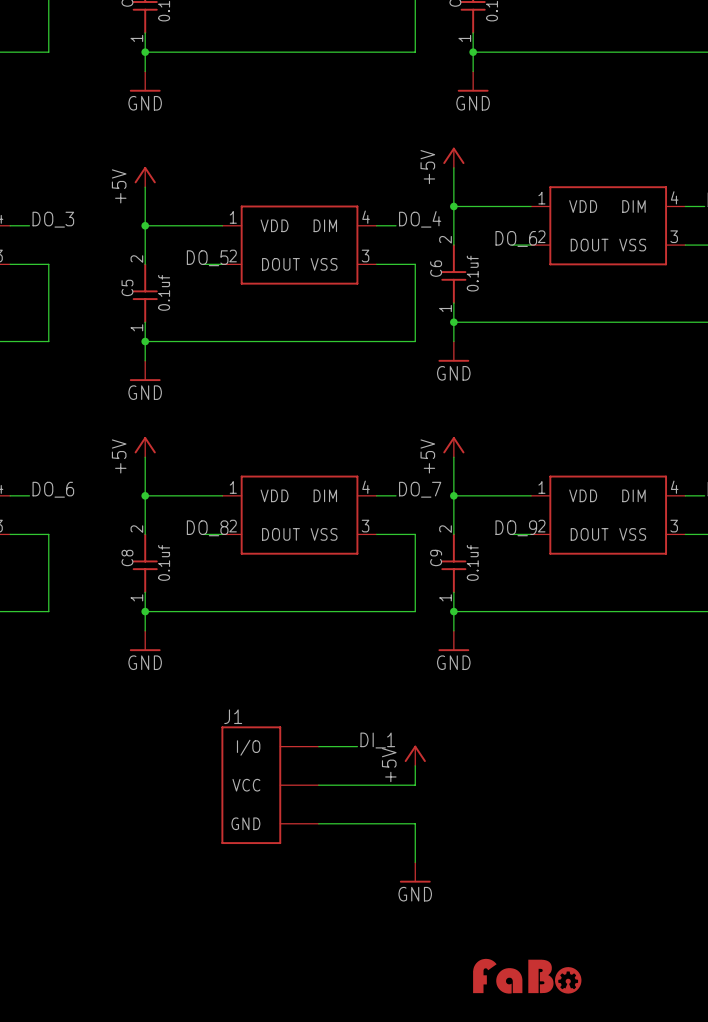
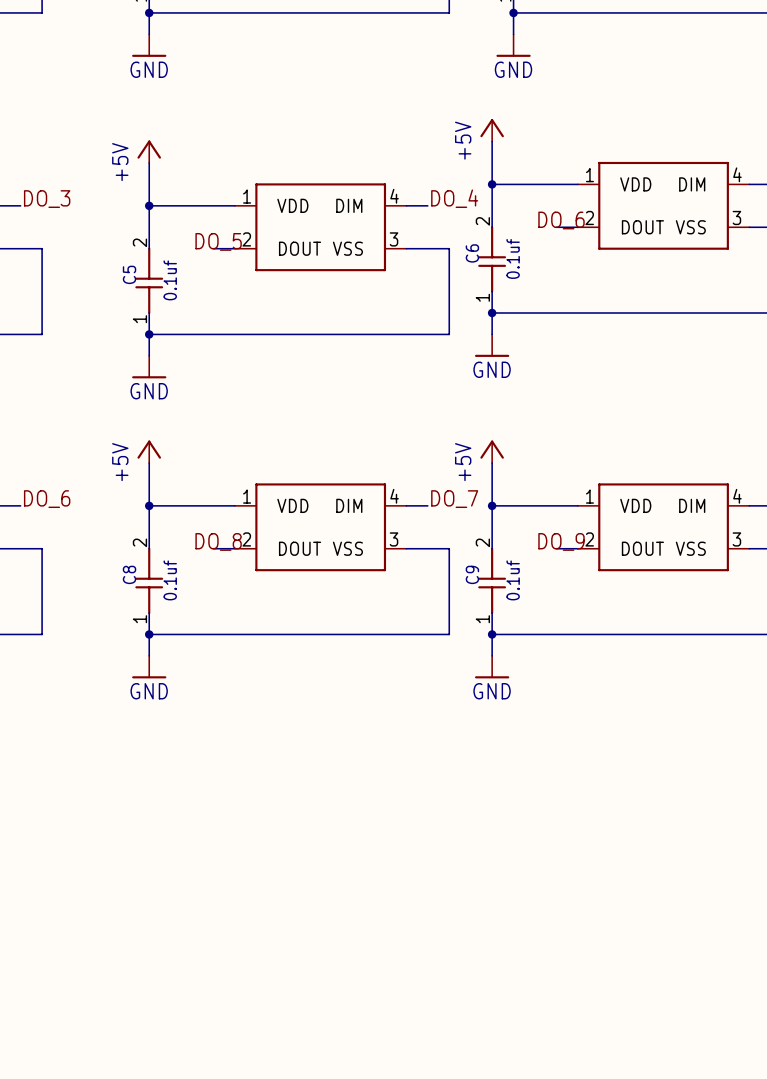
label: DI_1 (377, 740) -> none
wire: (318, 746) (357, 746) -> none
power symbol: +5V (415, 755) -> none
wire: (415, 765) (415, 785) (318, 785) -> none
J1: (270, 785) -> none
wire: (318, 823) (415, 823) (415, 862) -> none
power symbol: GND (415, 872) -> none
part: (527, 976) -> none

